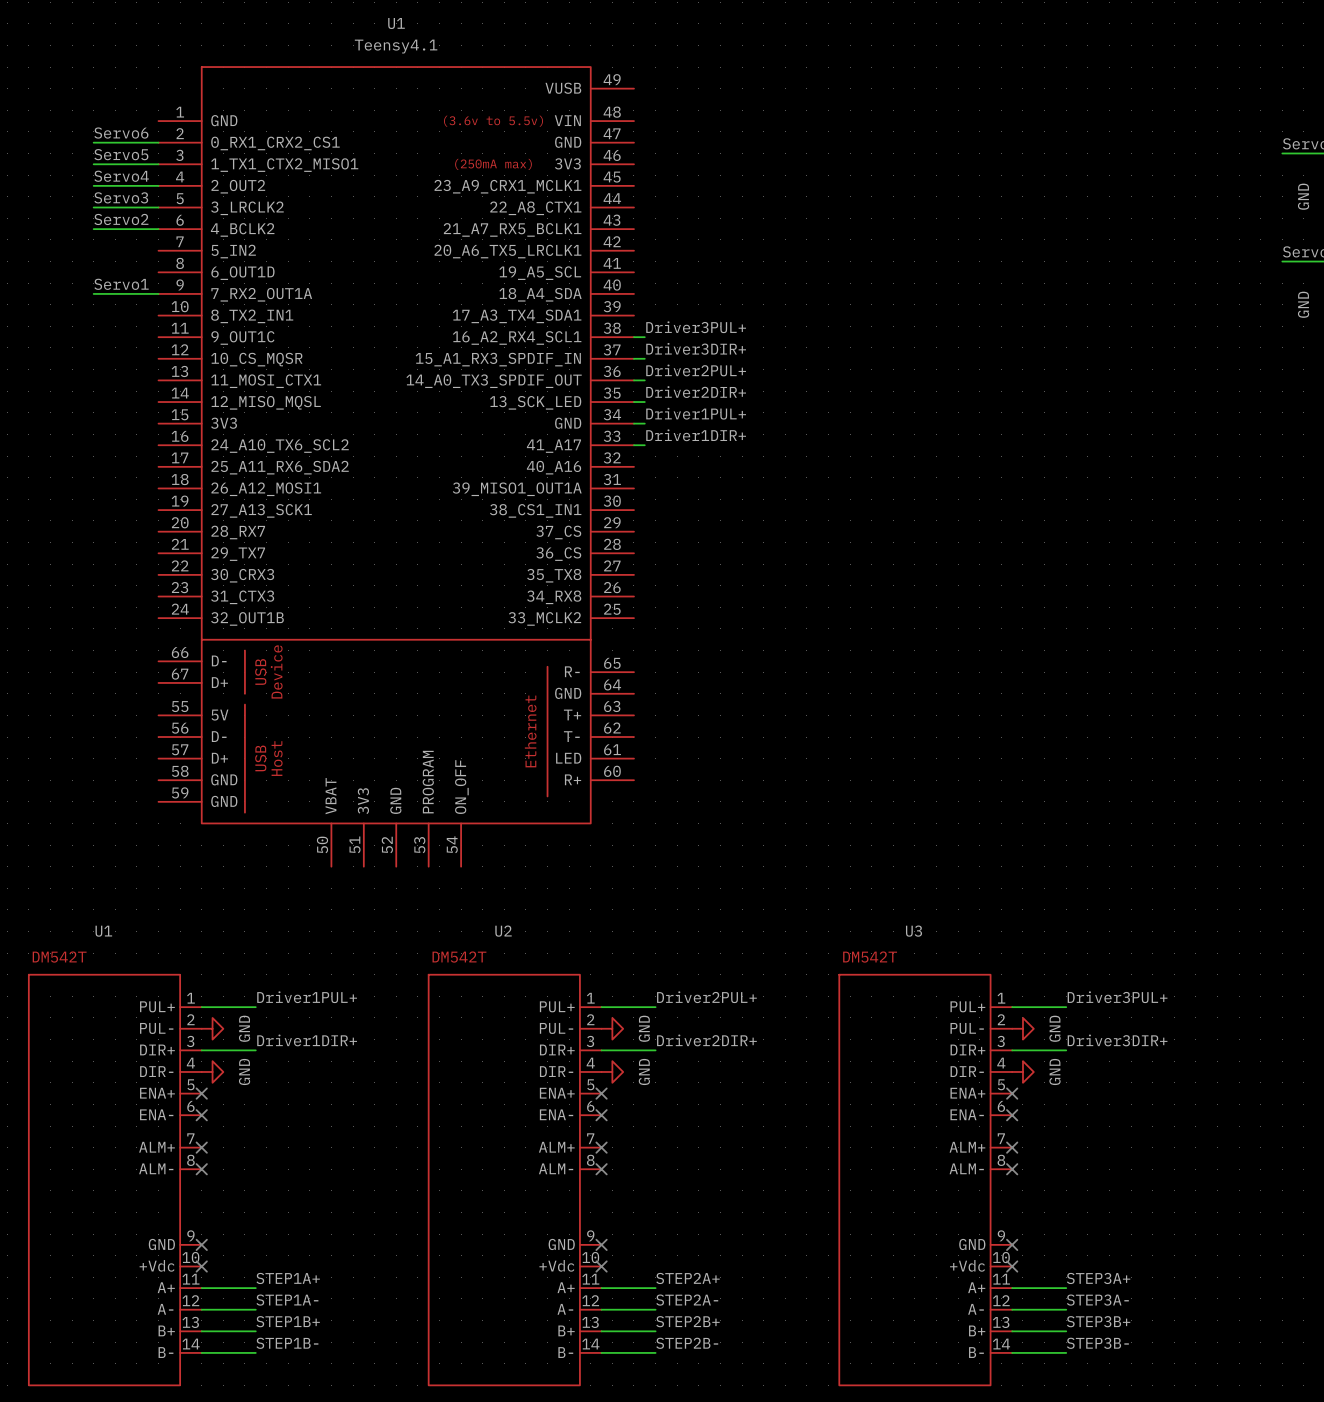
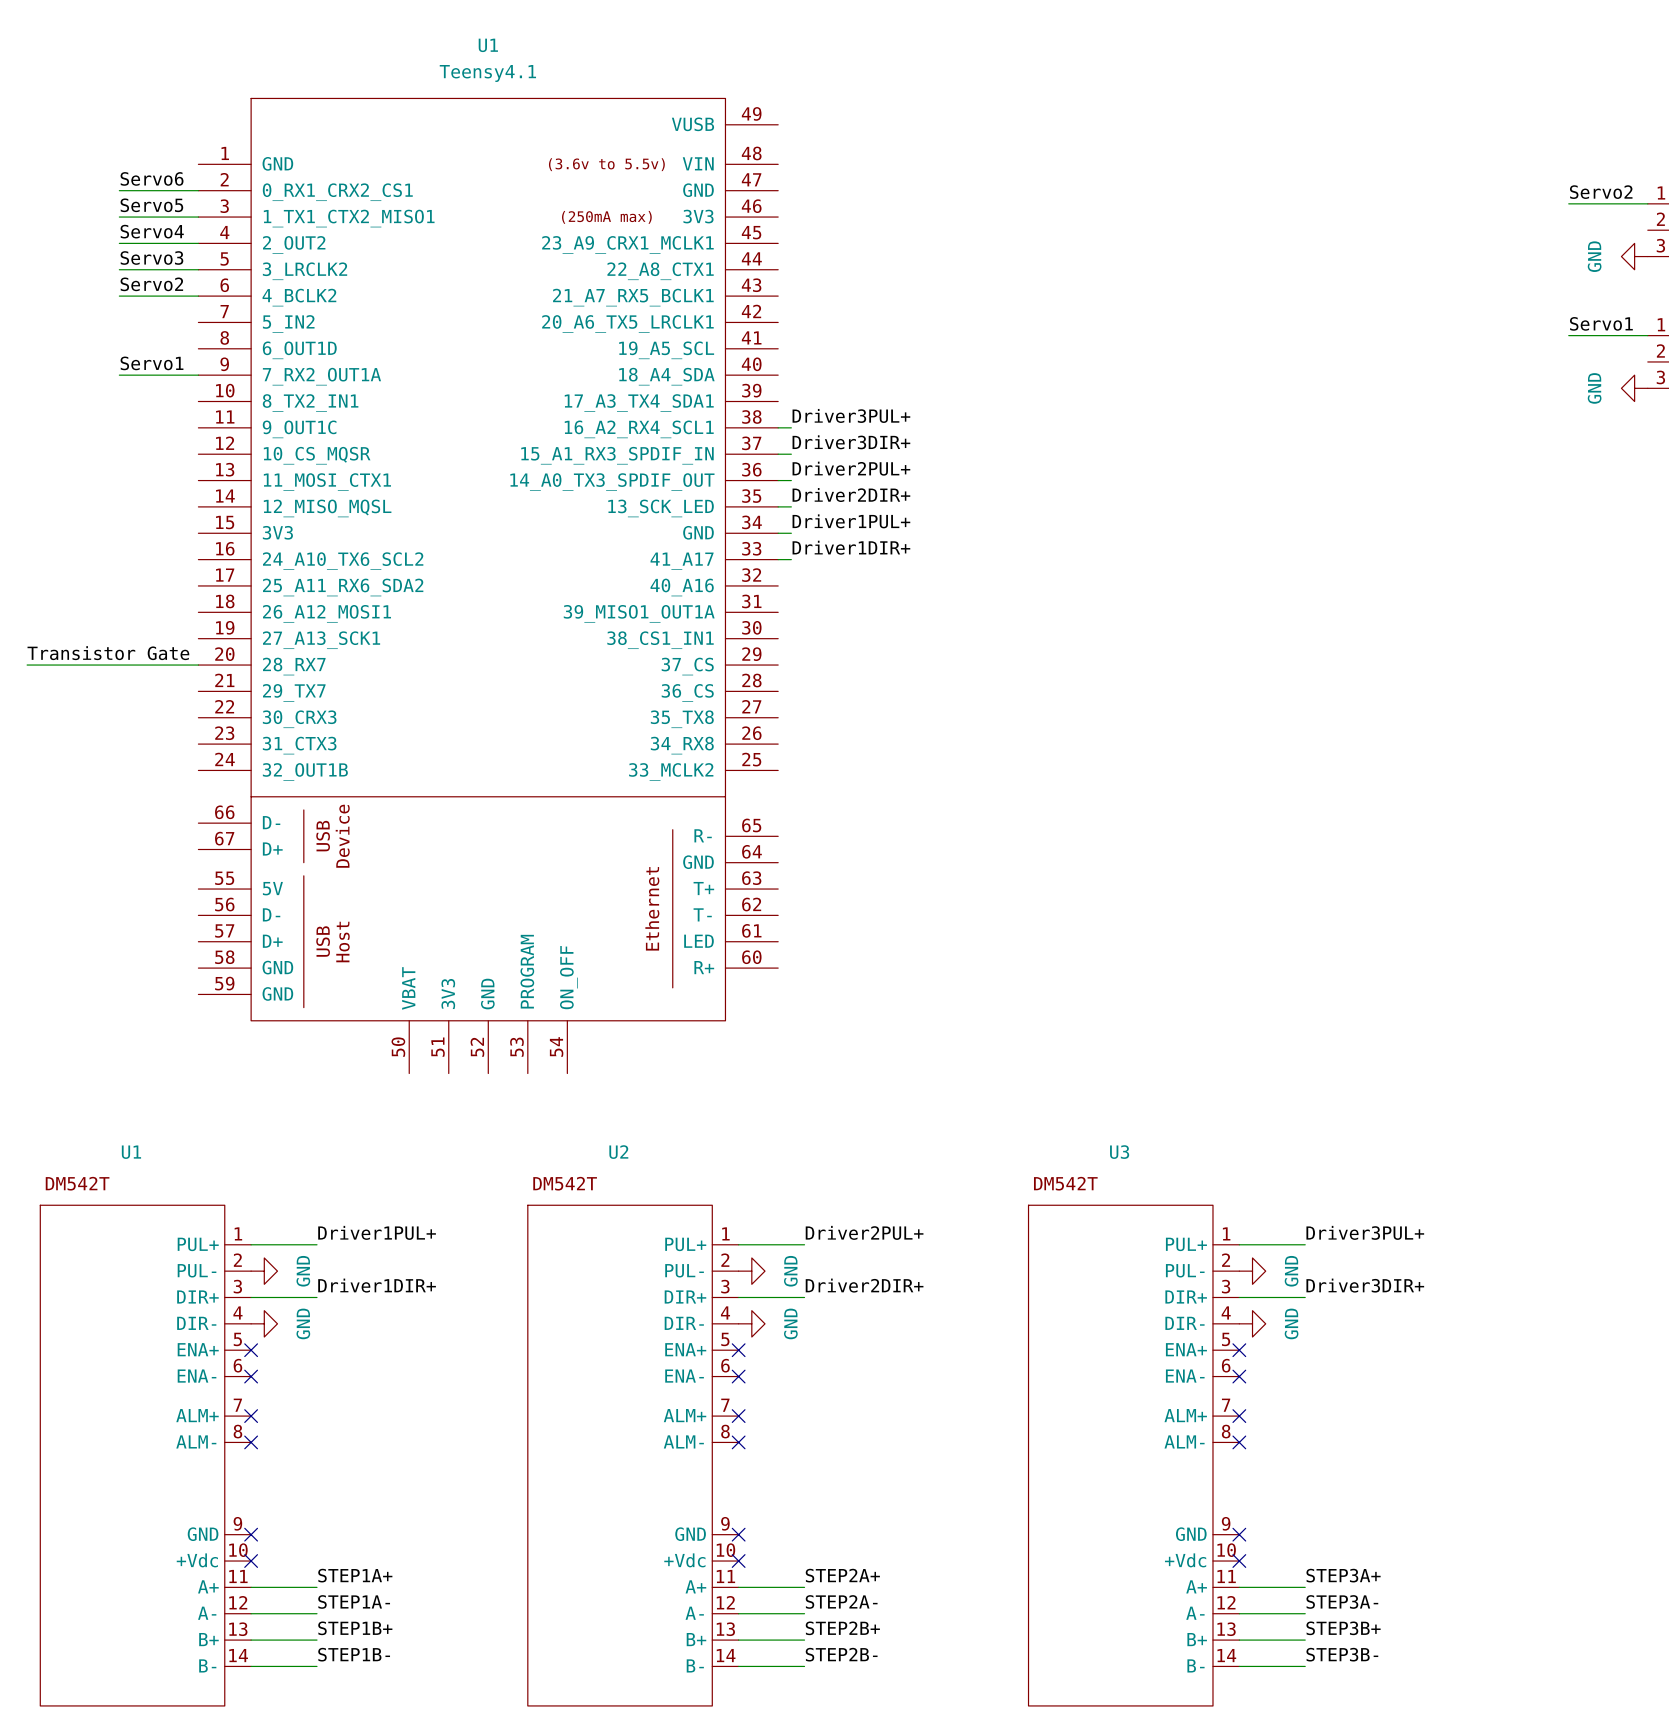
label: none -> Transistor Gate (108, 653)
wire: none -> (27, 665) (198, 665)

